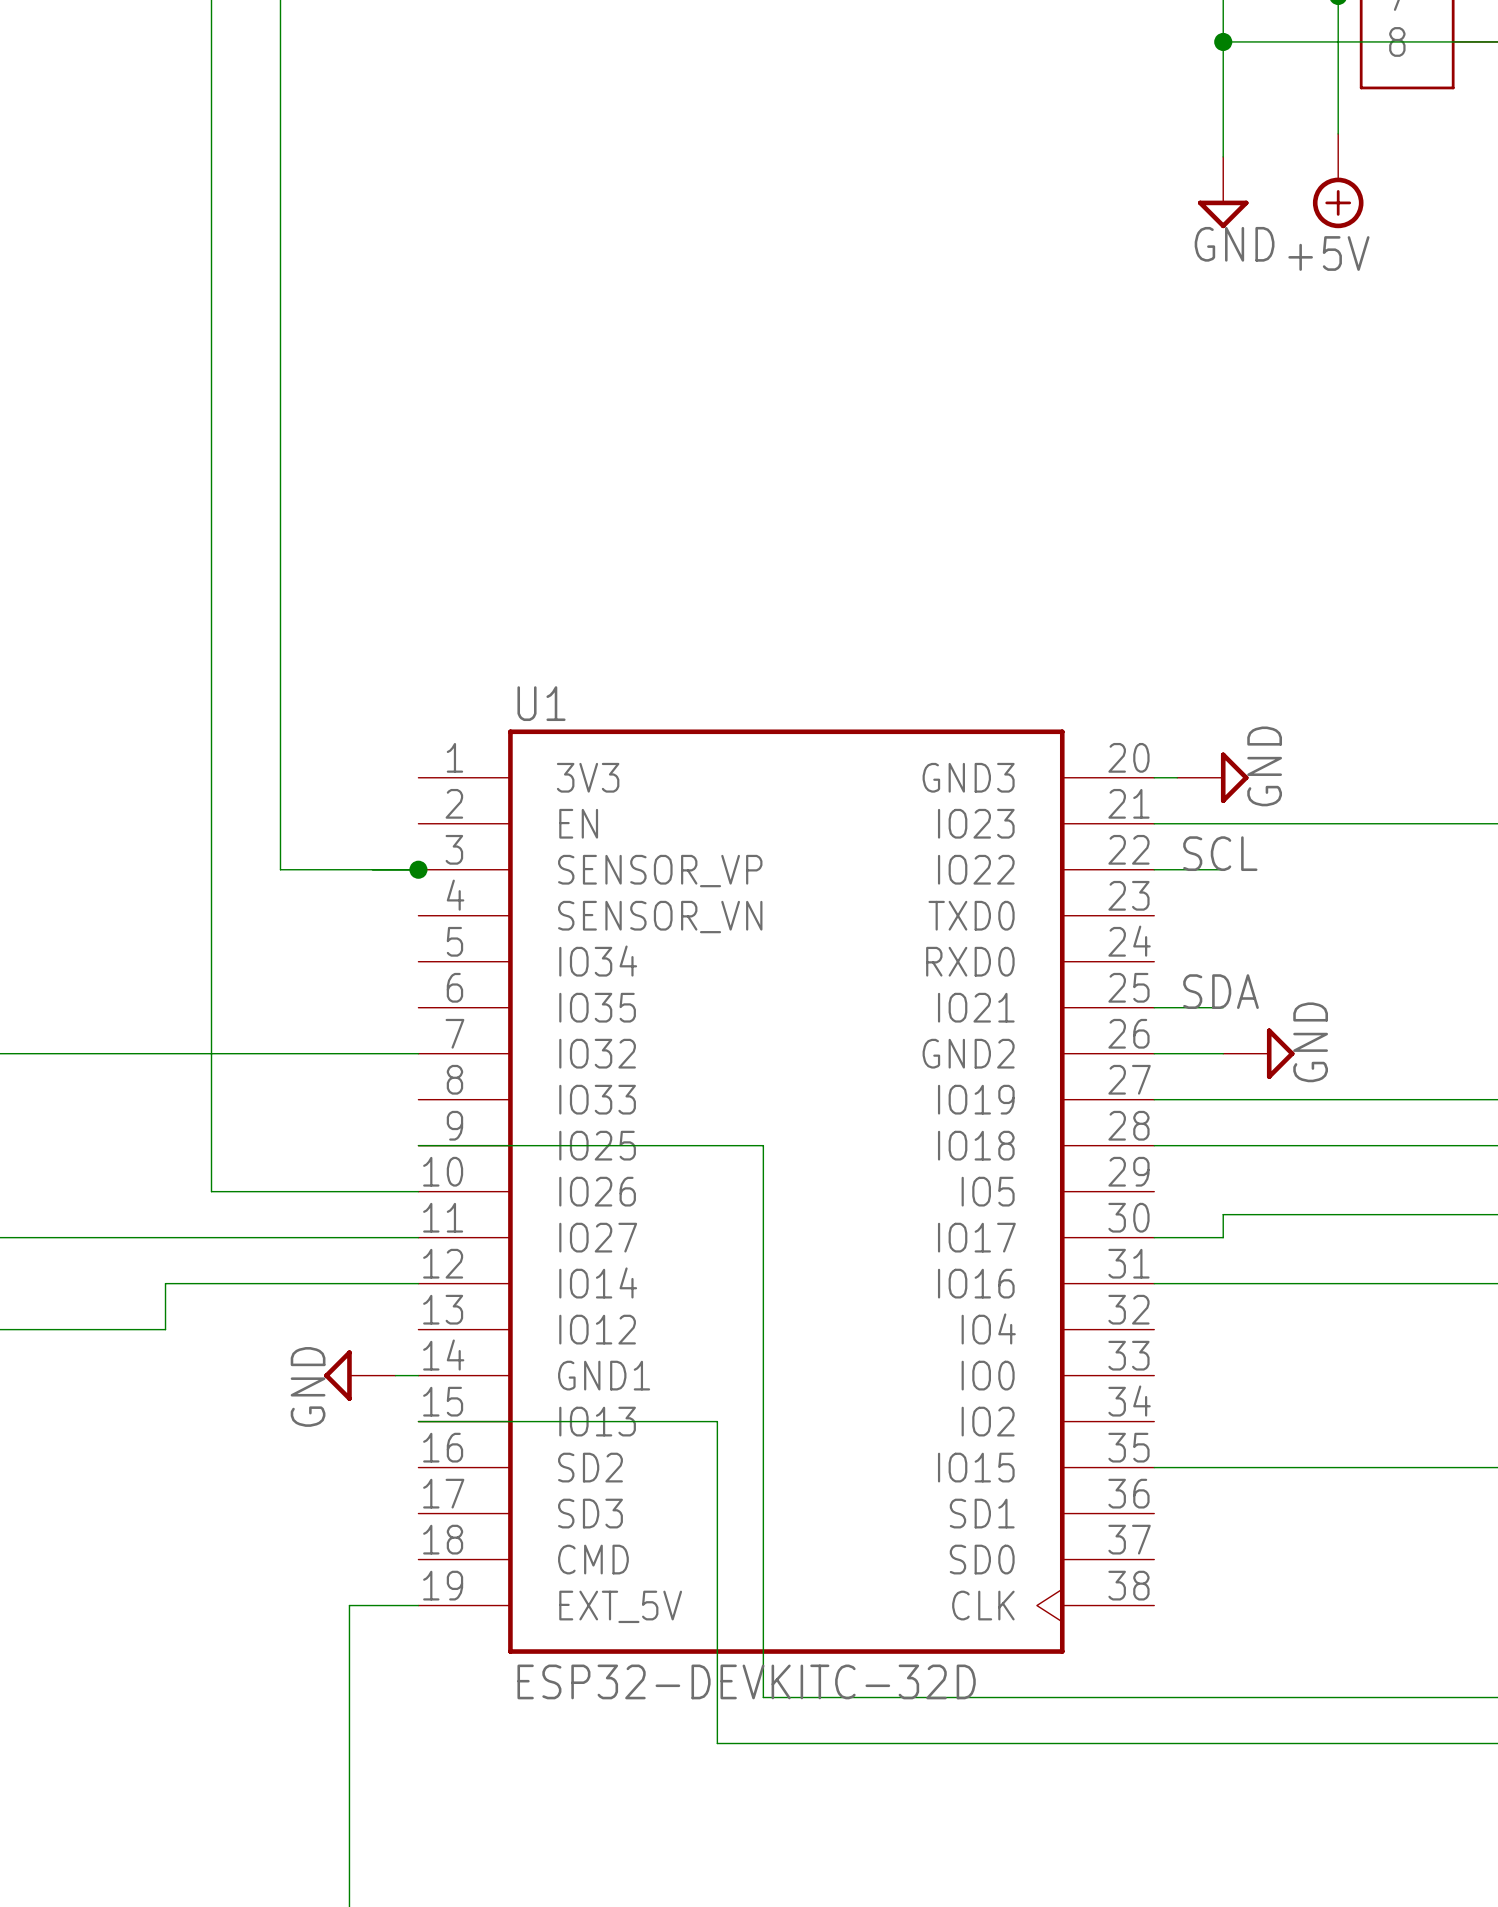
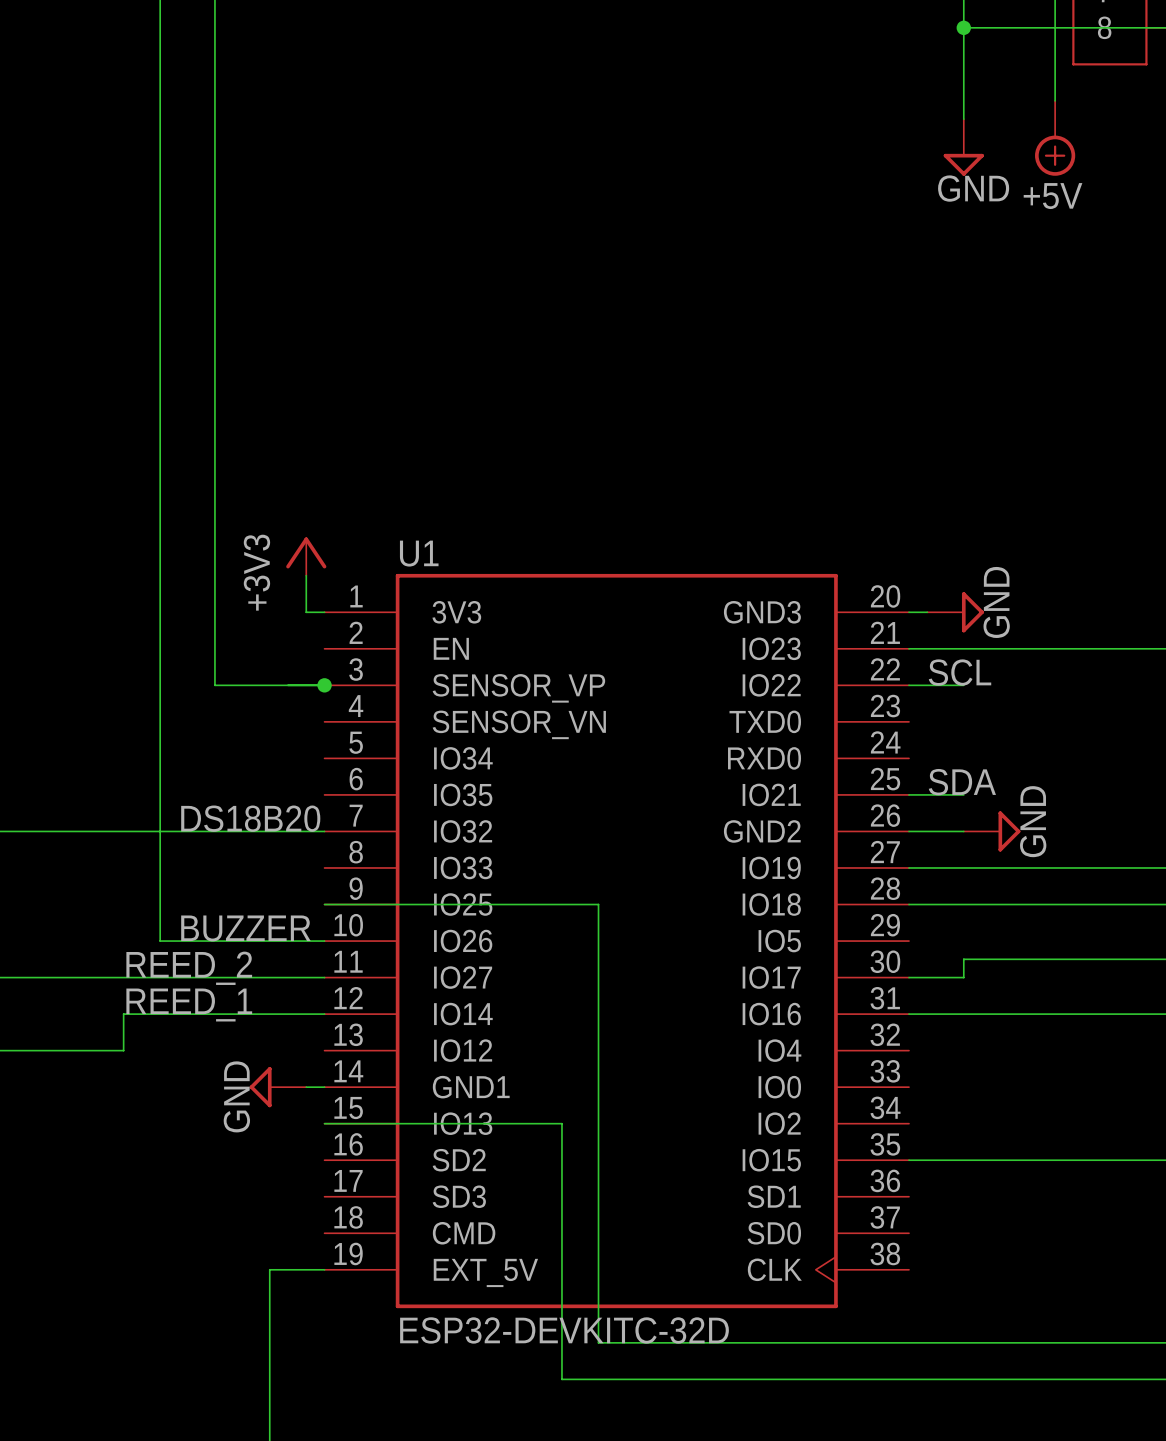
power symbol: none -> +3V3 (306, 556)
wire: none -> (306, 575) (306, 612) (324, 612)
label: none -> DS18B20 (250, 818)
label: none -> BUZZER (245, 928)
label: none -> REED_2 (189, 968)
label: none -> REED_1 (189, 1005)

